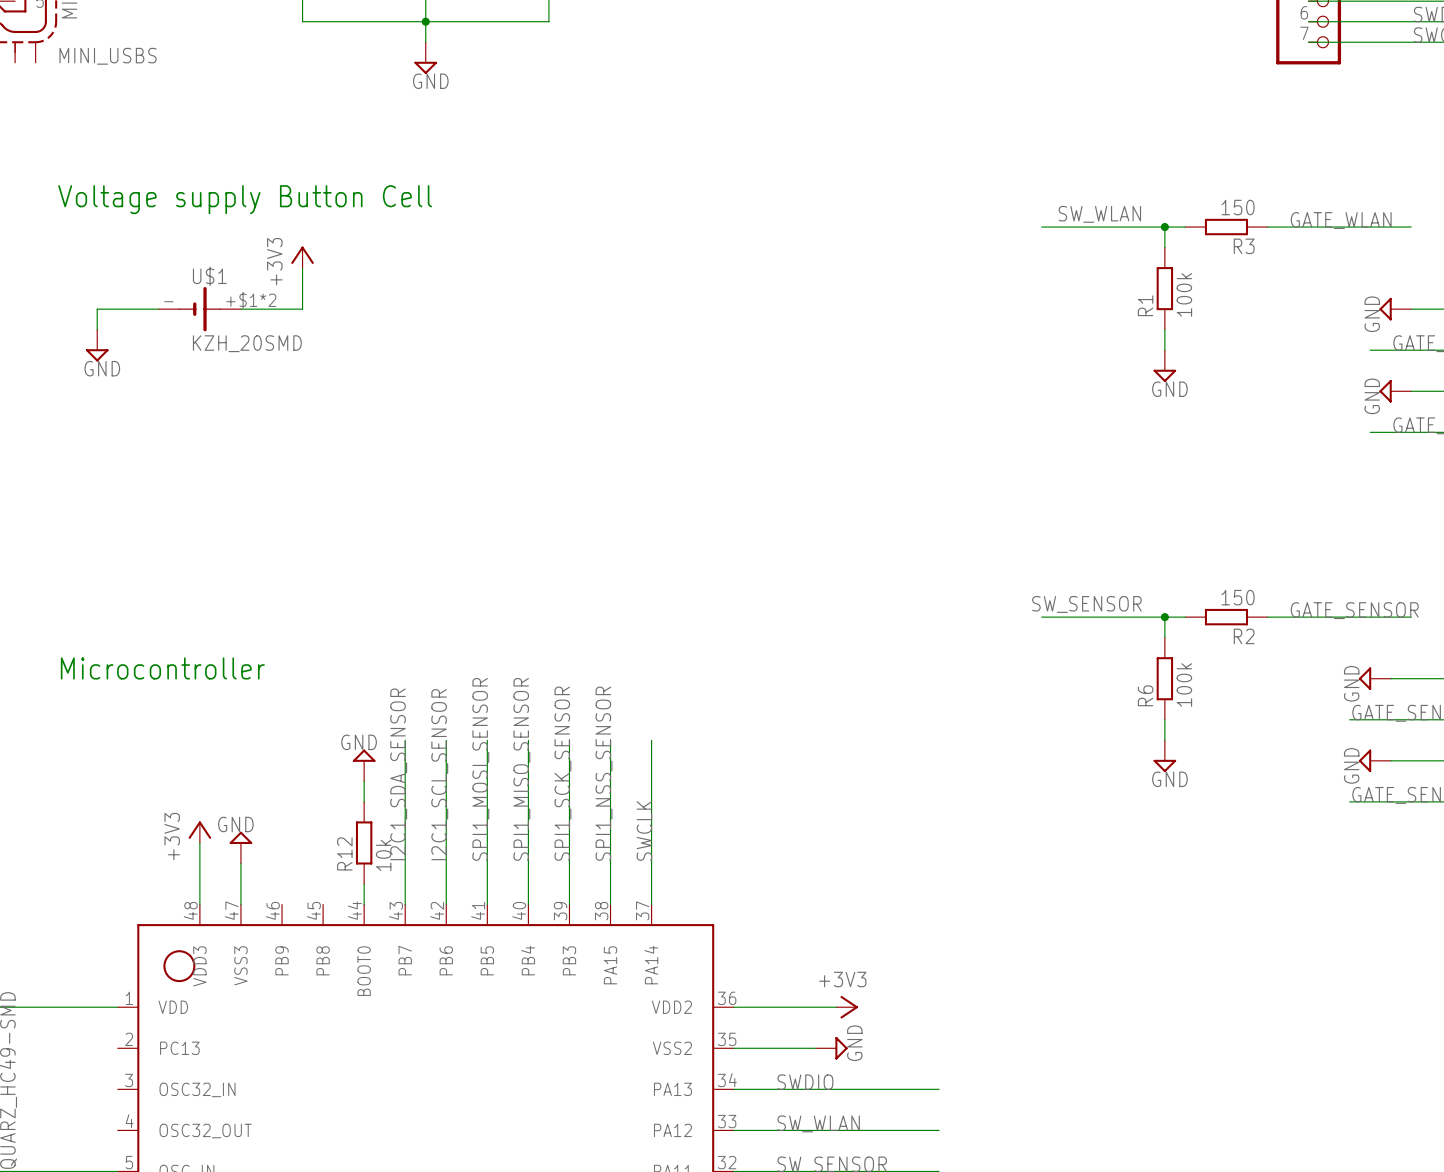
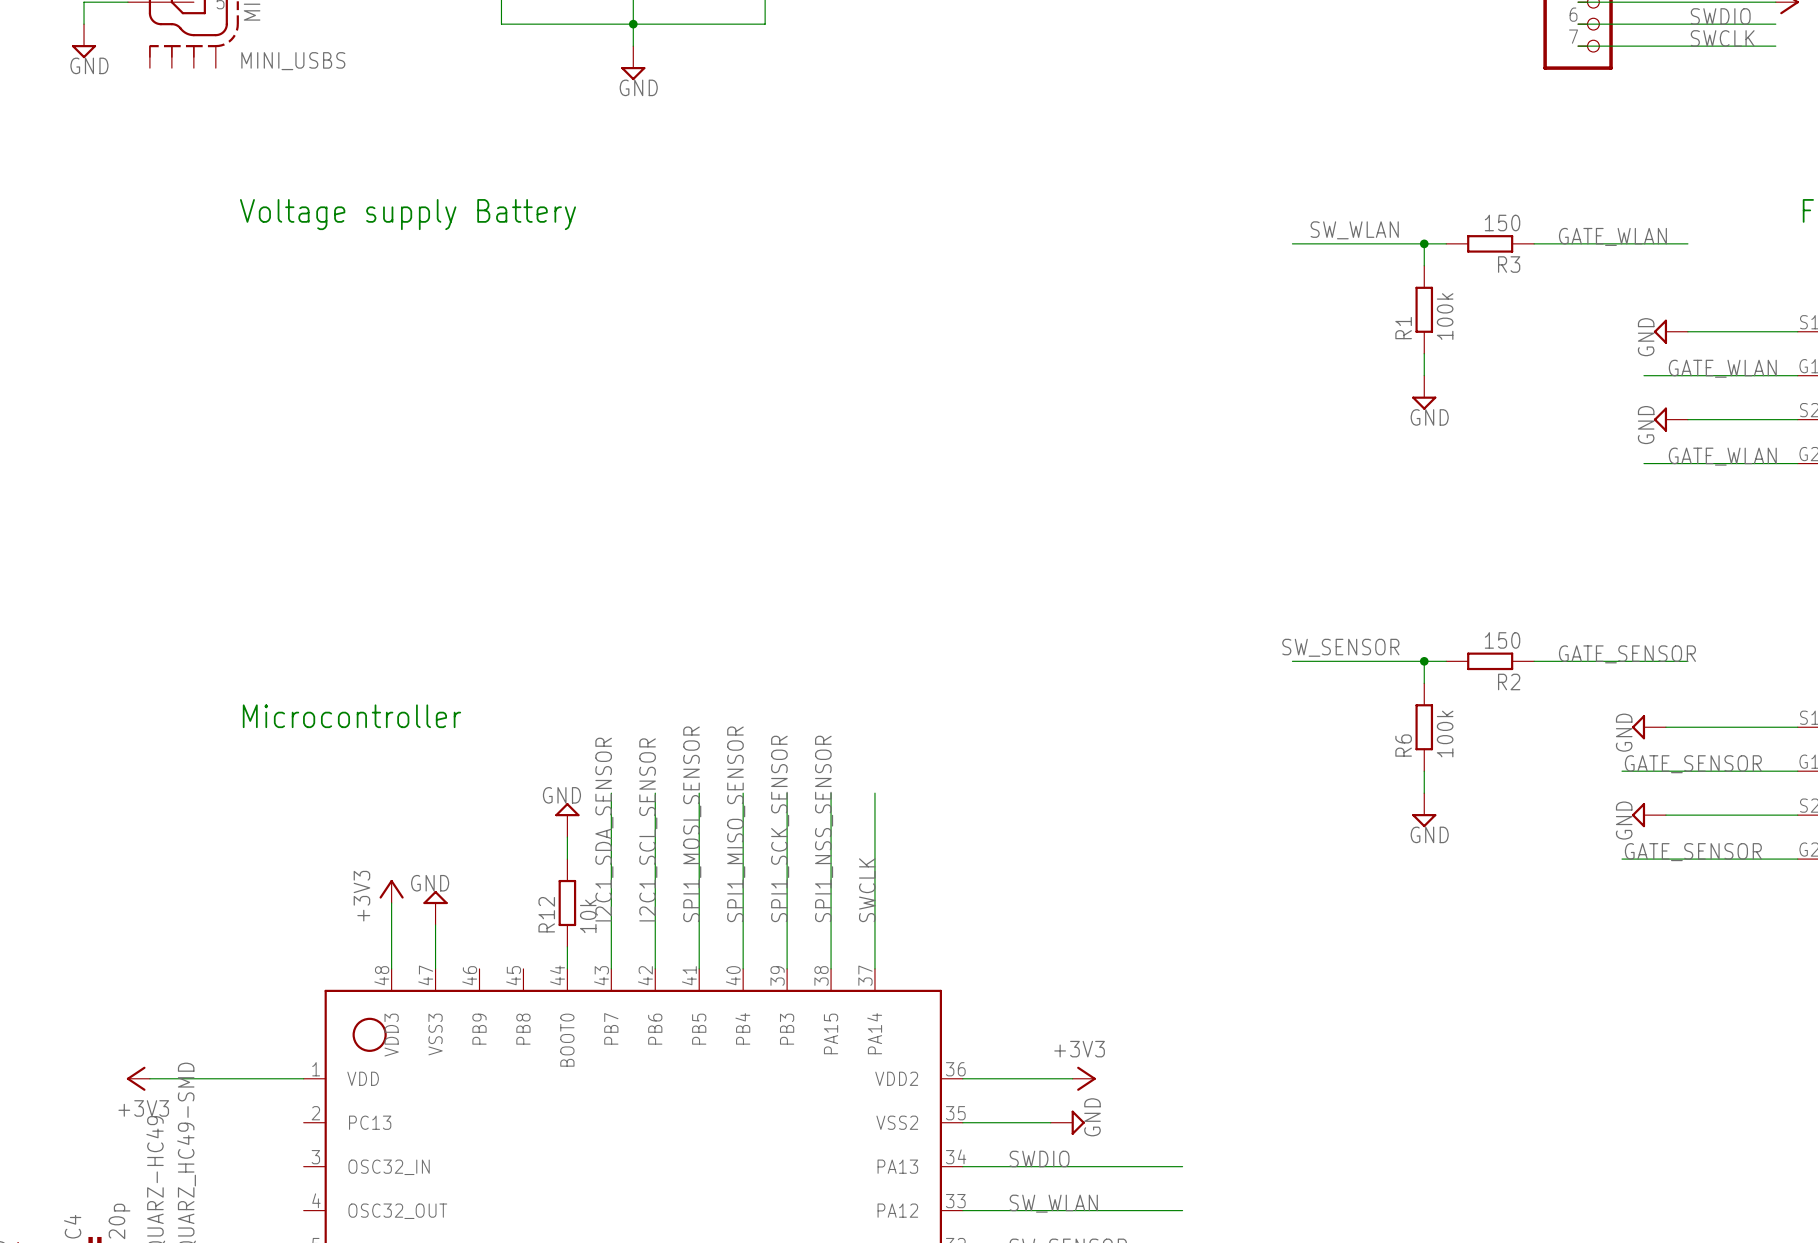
text: Voltage supply Button Cell (245, 199) -> Voltage supply Battery (407, 214)
power symbol: +3V3 (302, 257) -> none
wire: (302, 268) (302, 309) (240, 309) -> none
wire: (158, 309) (97, 309) (97, 329) -> none
U$1: KZH_20SMD (199, 309) -> none
power symbol: GND (97, 345) -> none

